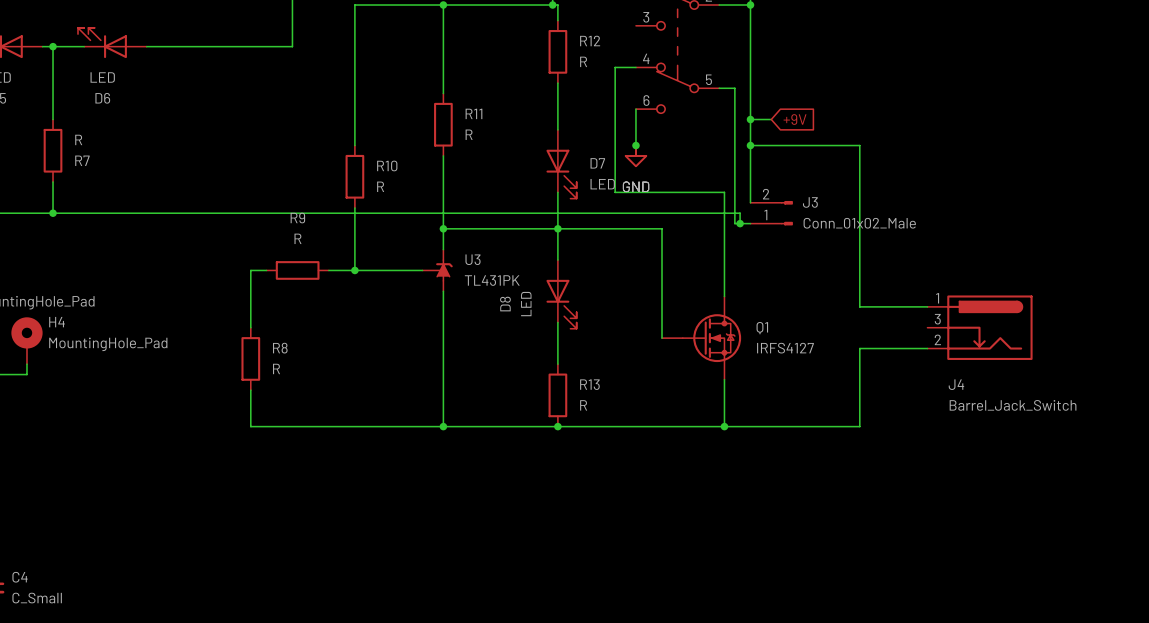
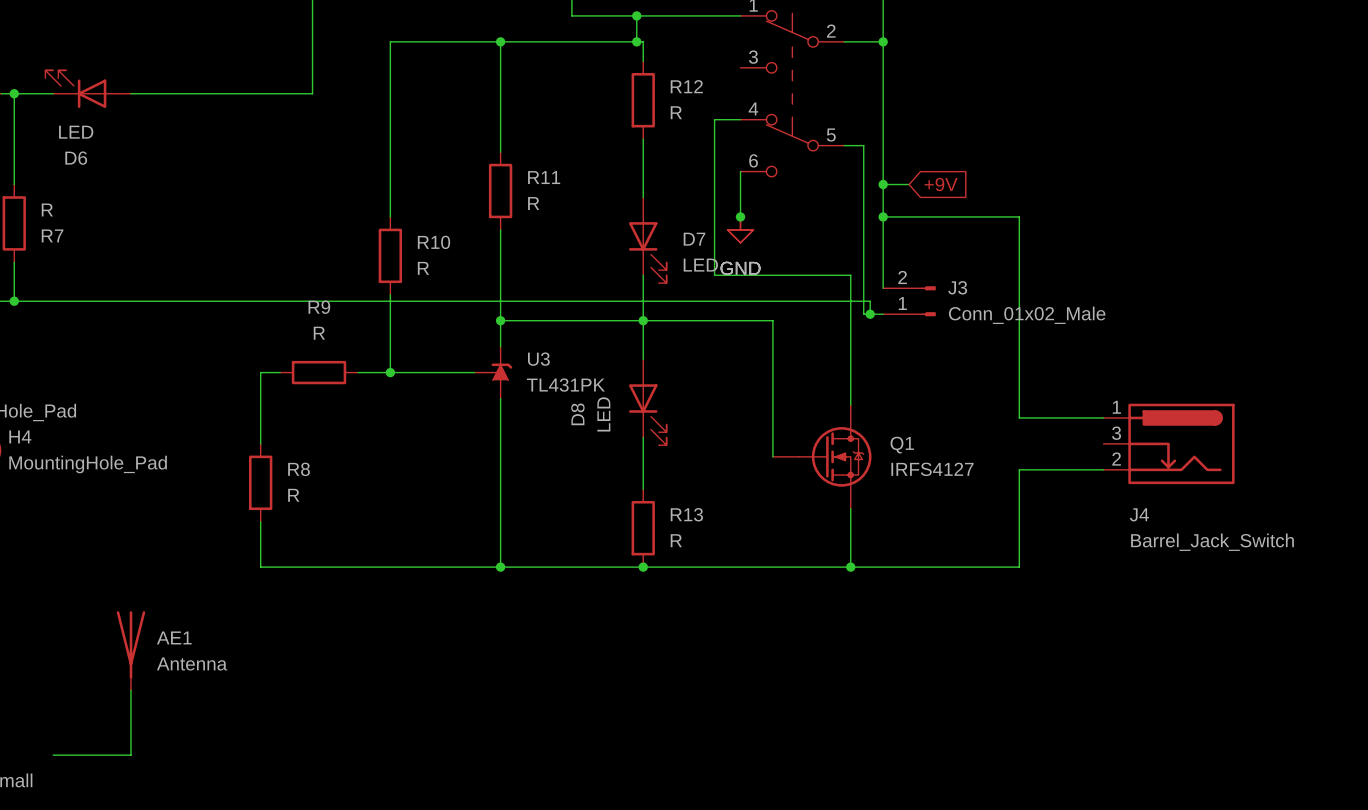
AE1: none -> Antenna (130, 650)
wire: none -> (130, 690) (130, 755) (53, 755)

